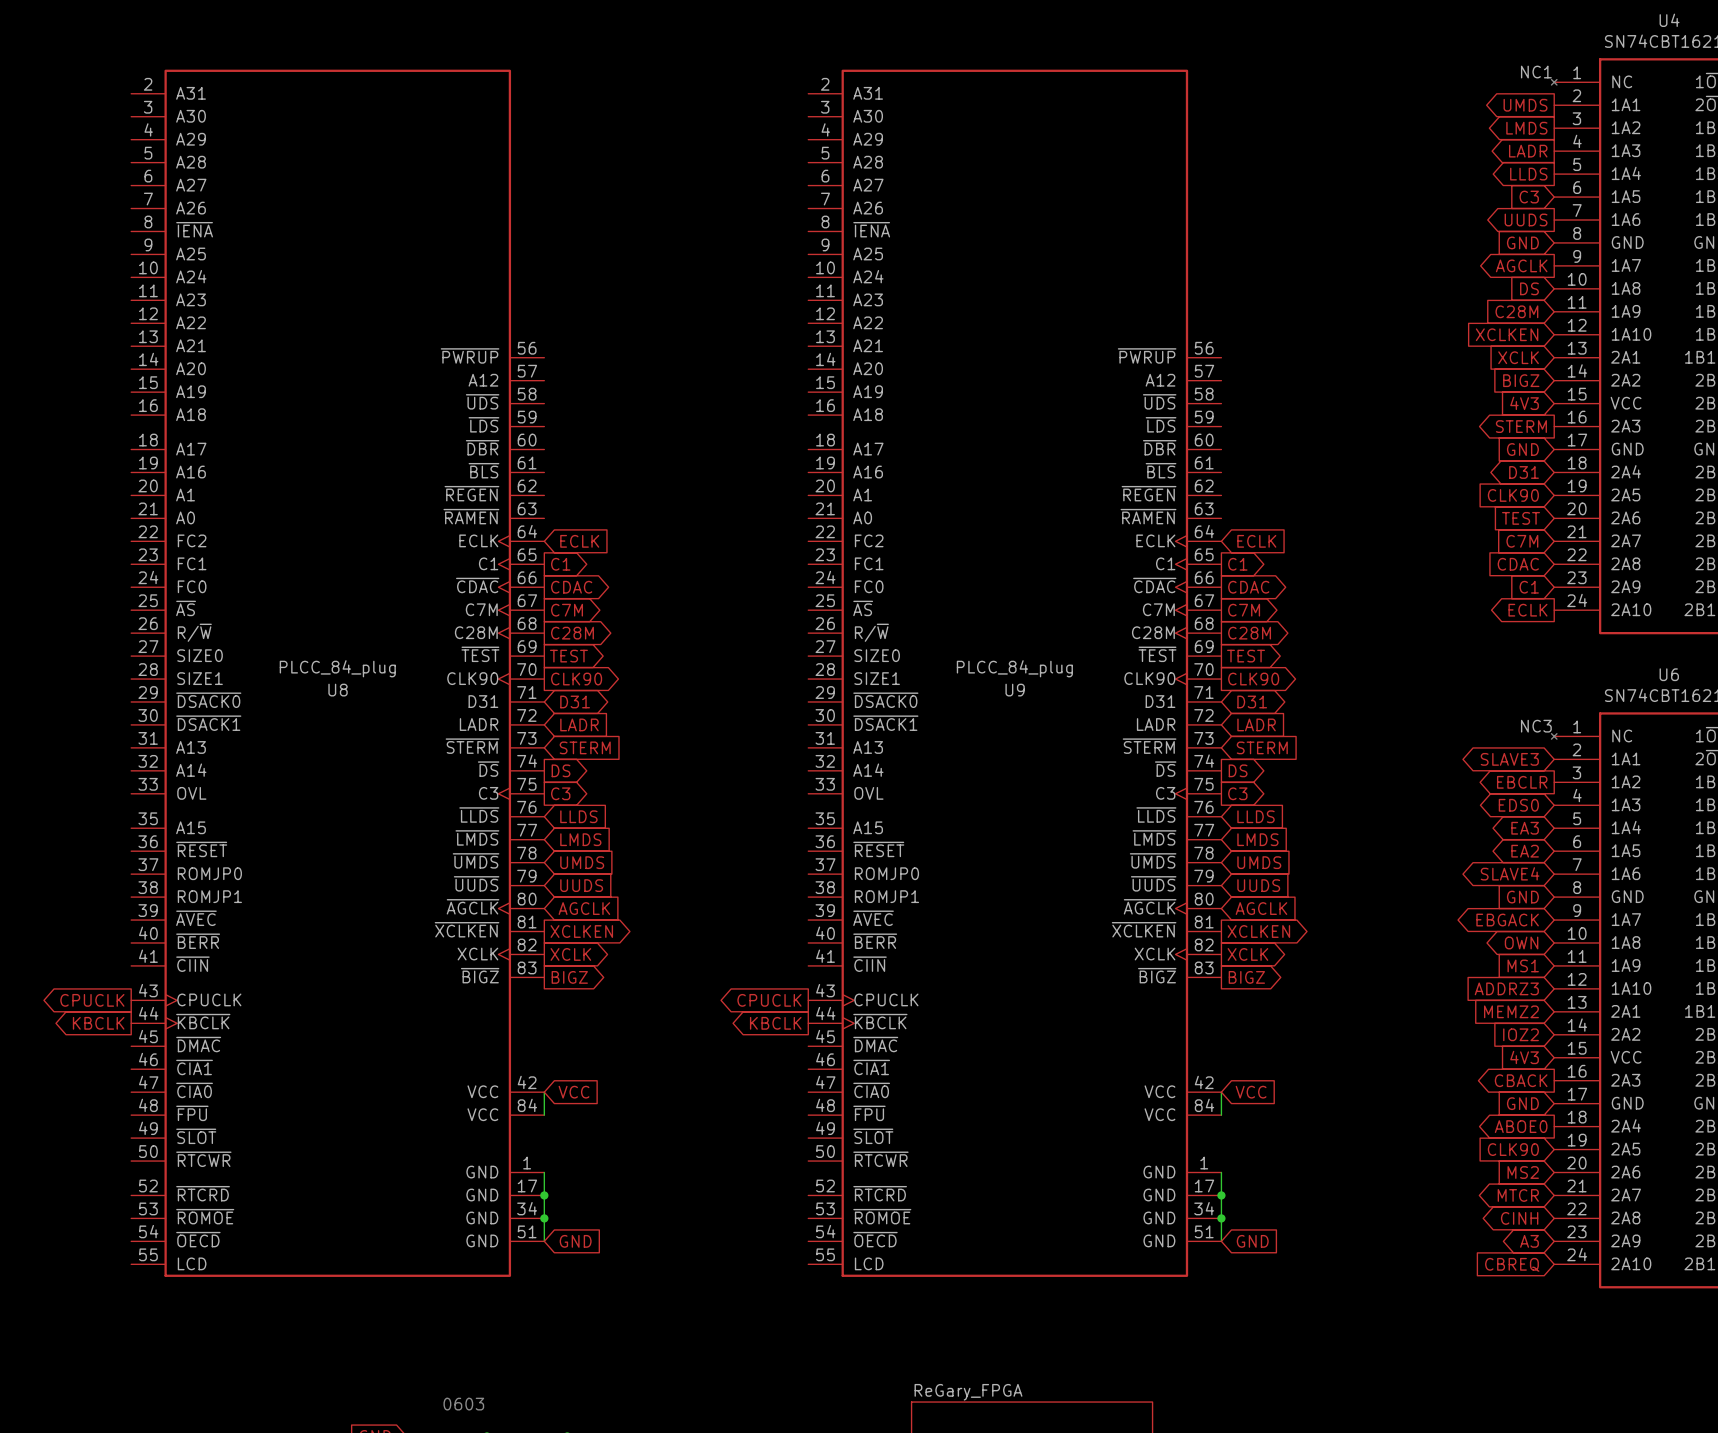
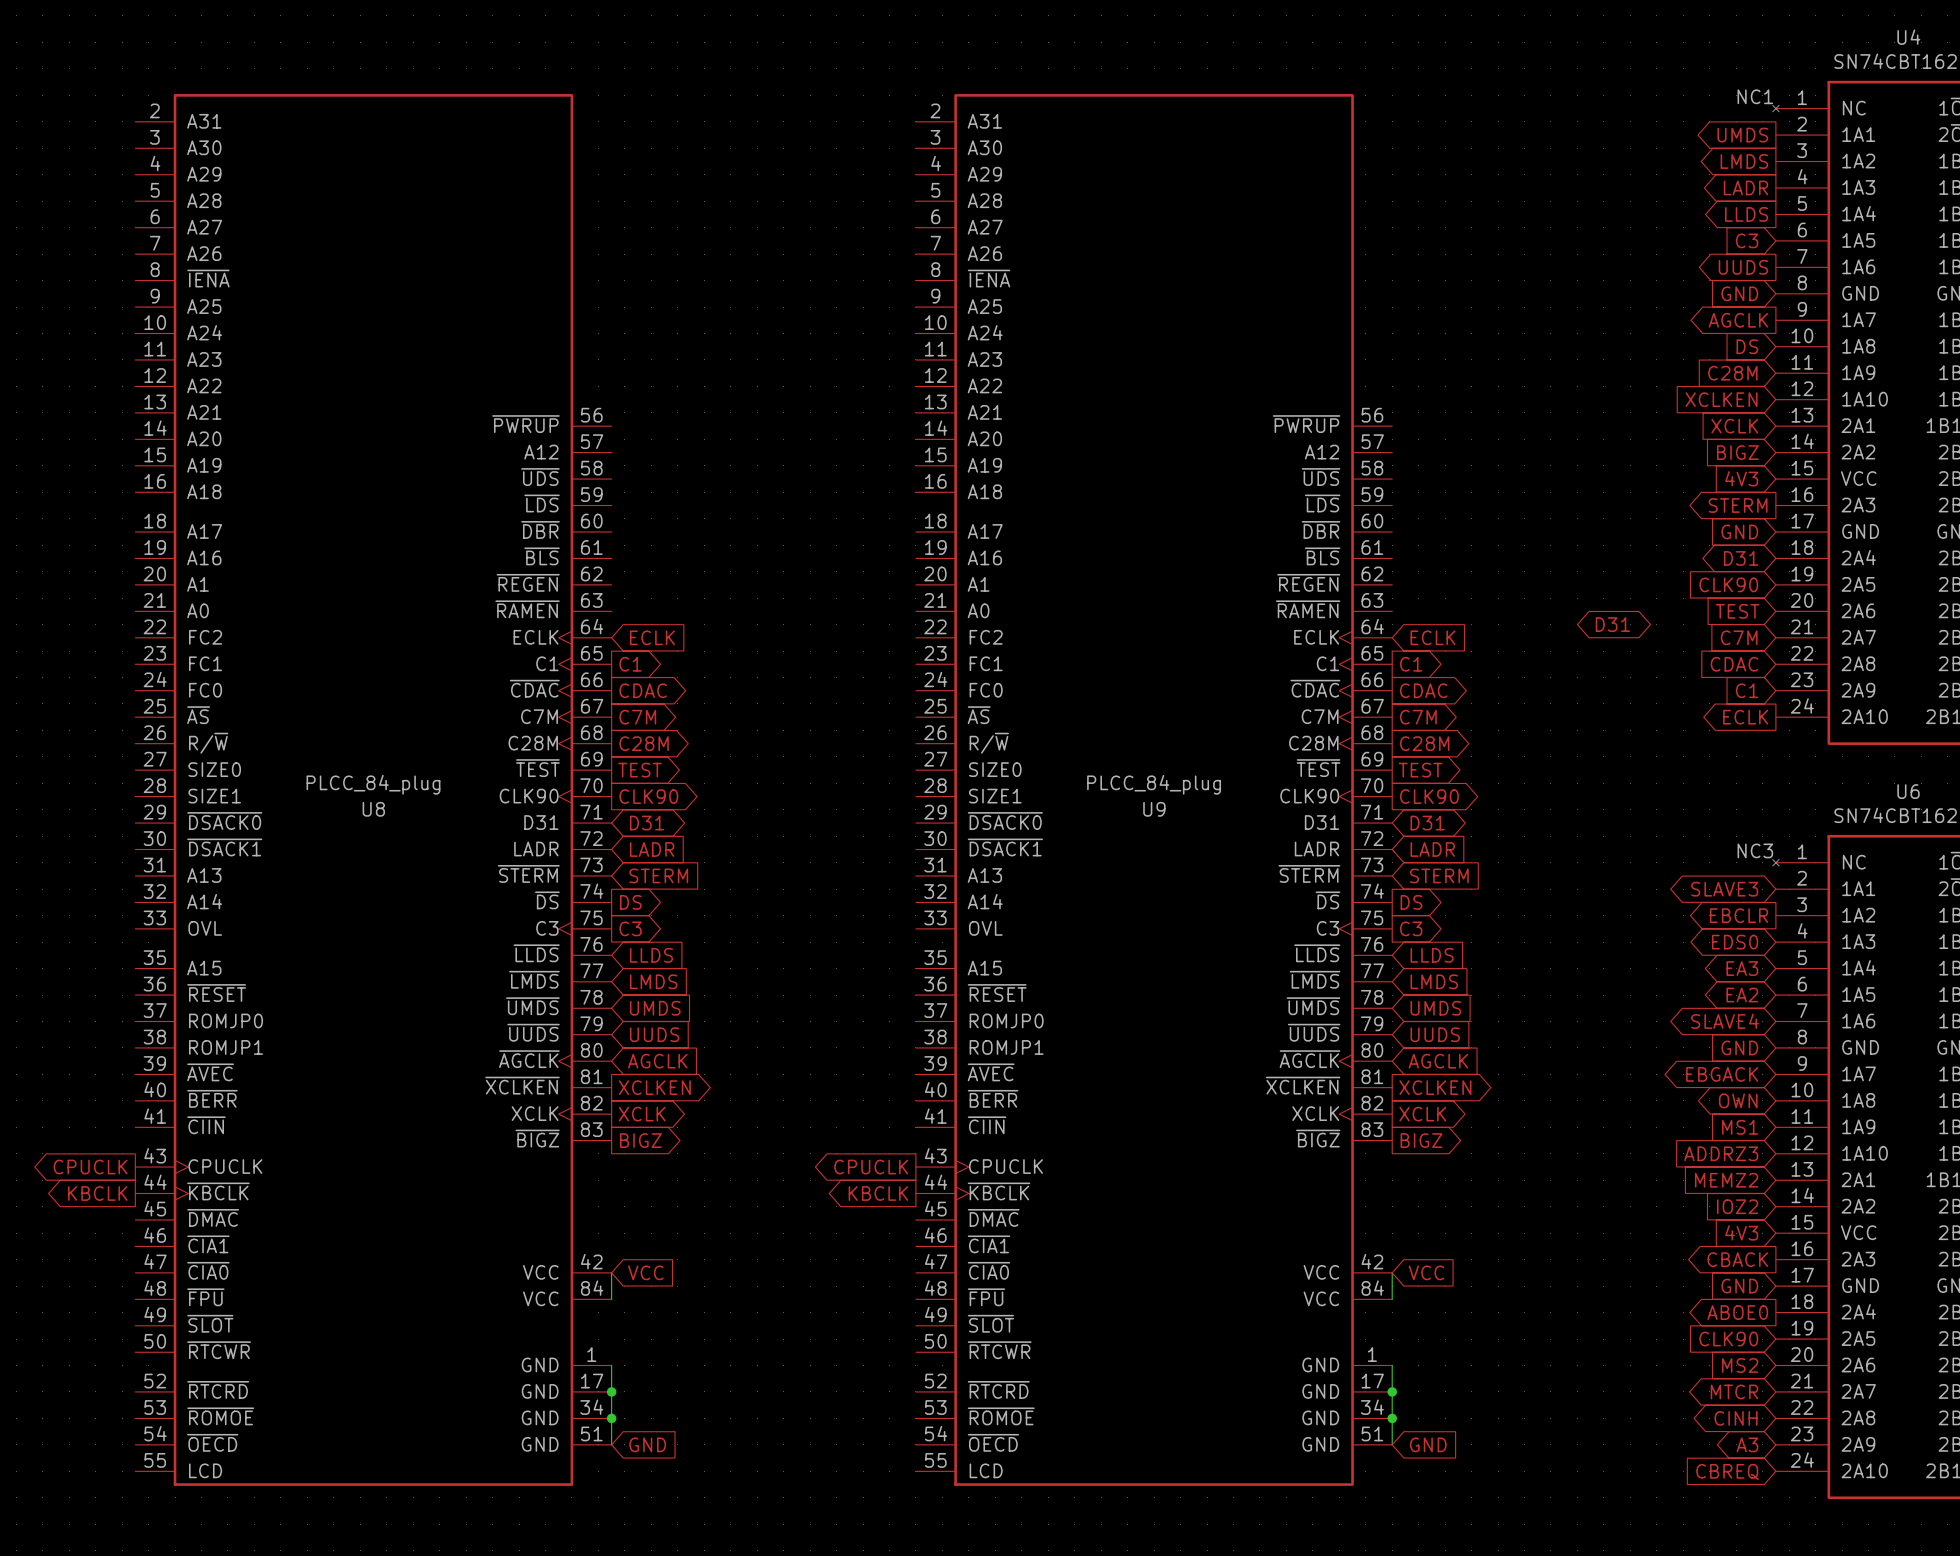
global label: none -> D31 (1612, 624)

